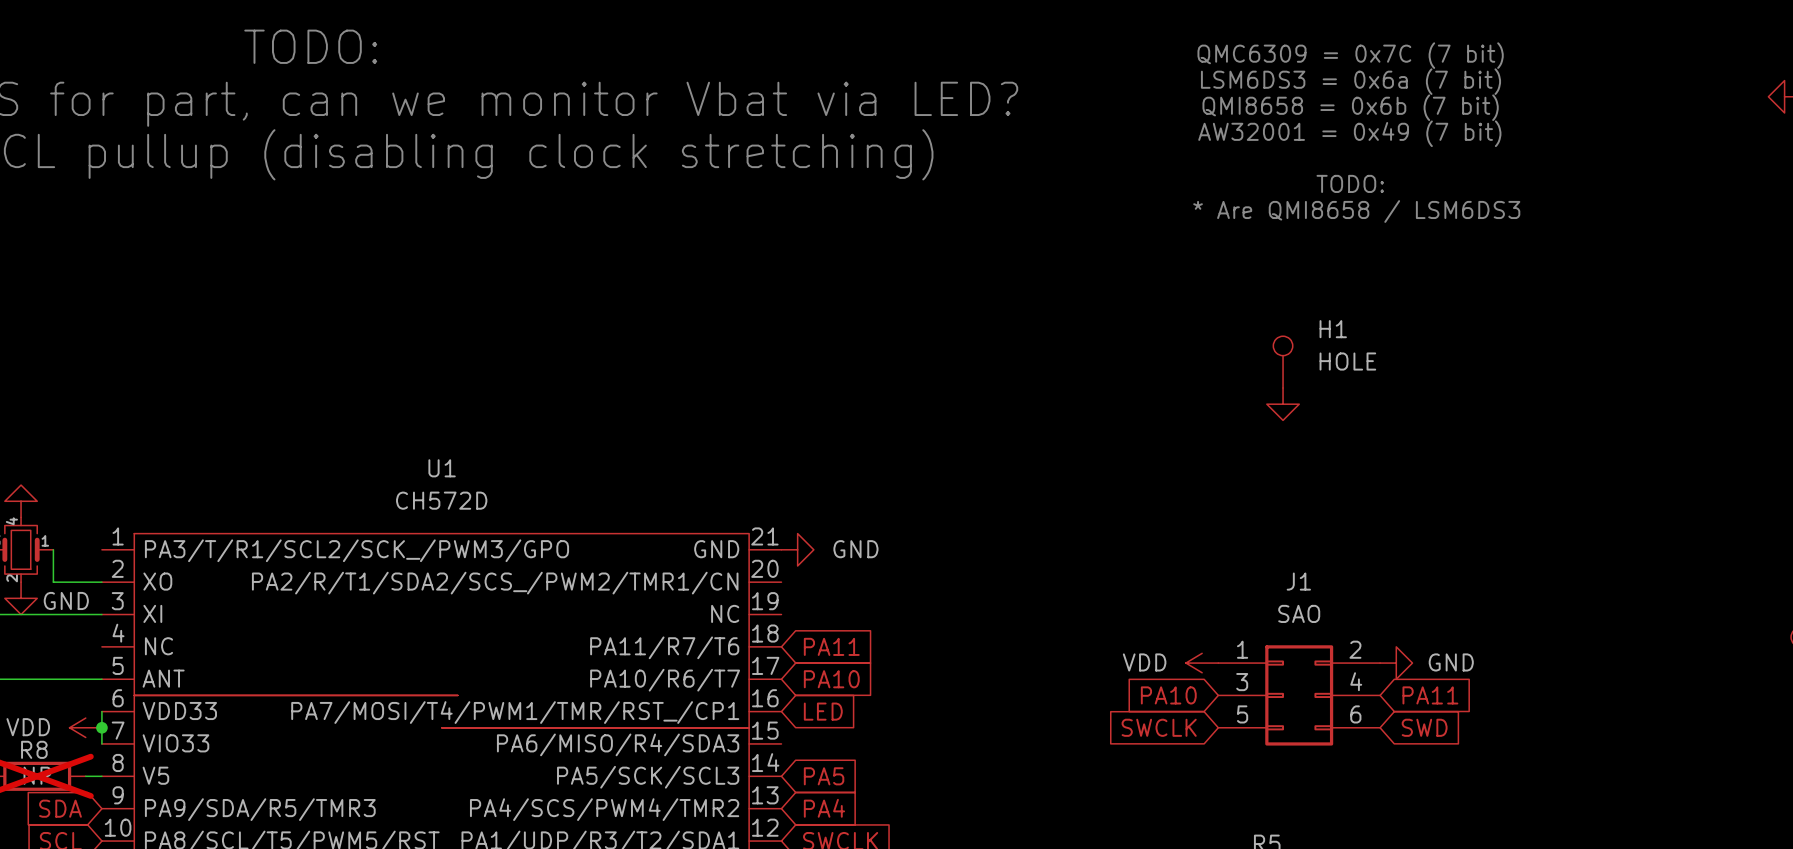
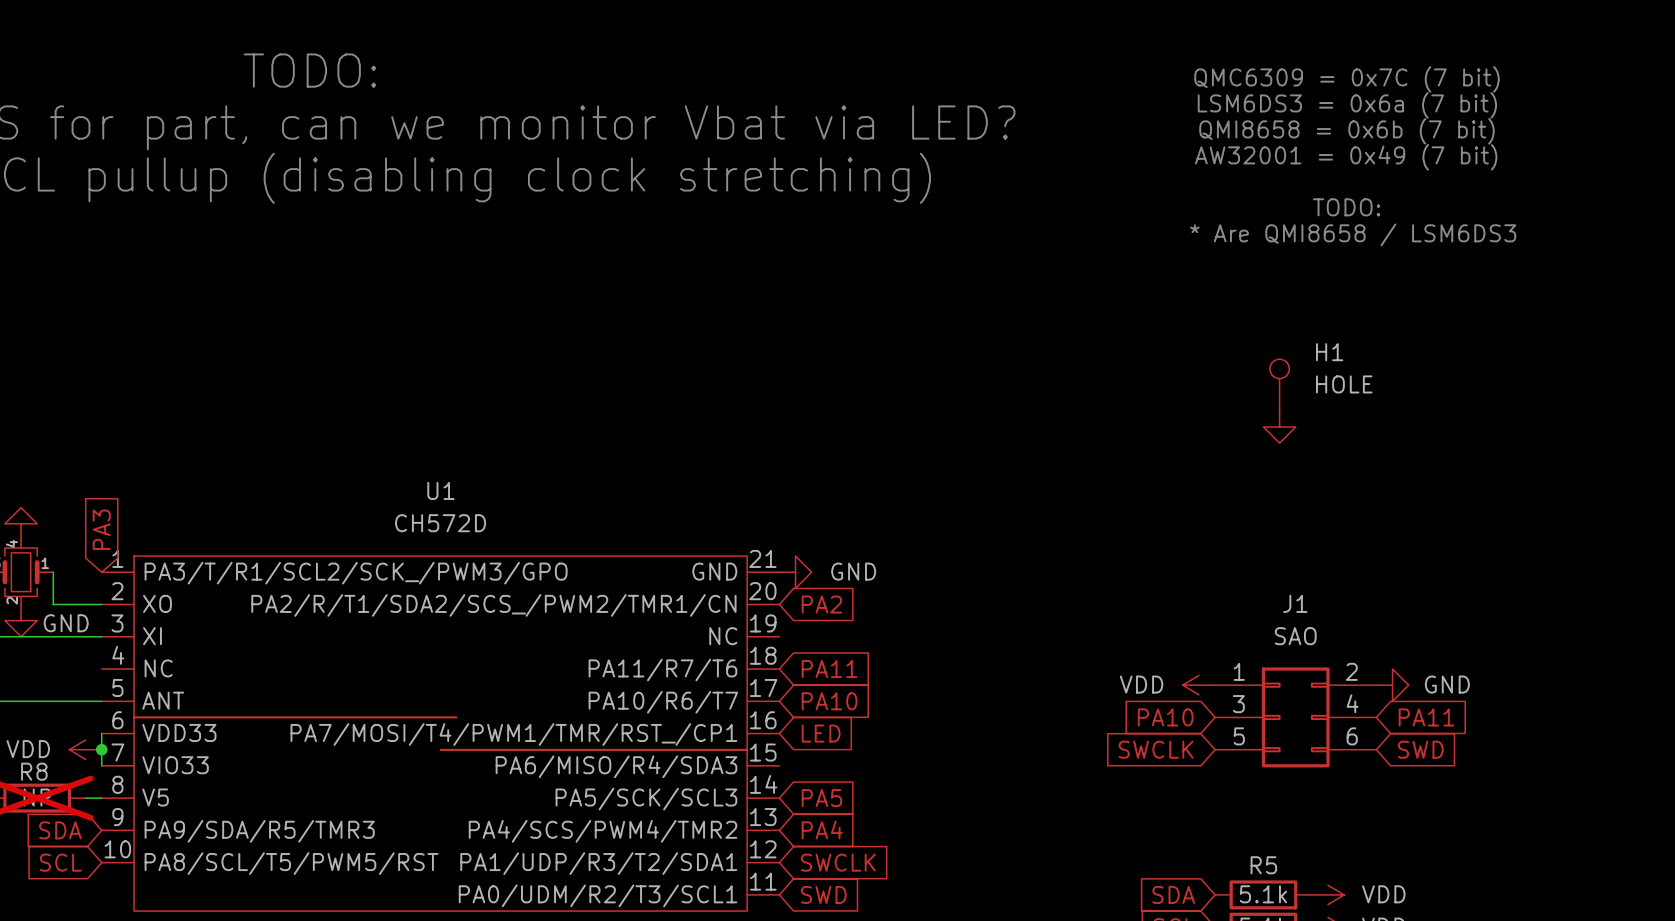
global label: none -> PA3 (101, 529)
global label: none -> PA2 (821, 604)

